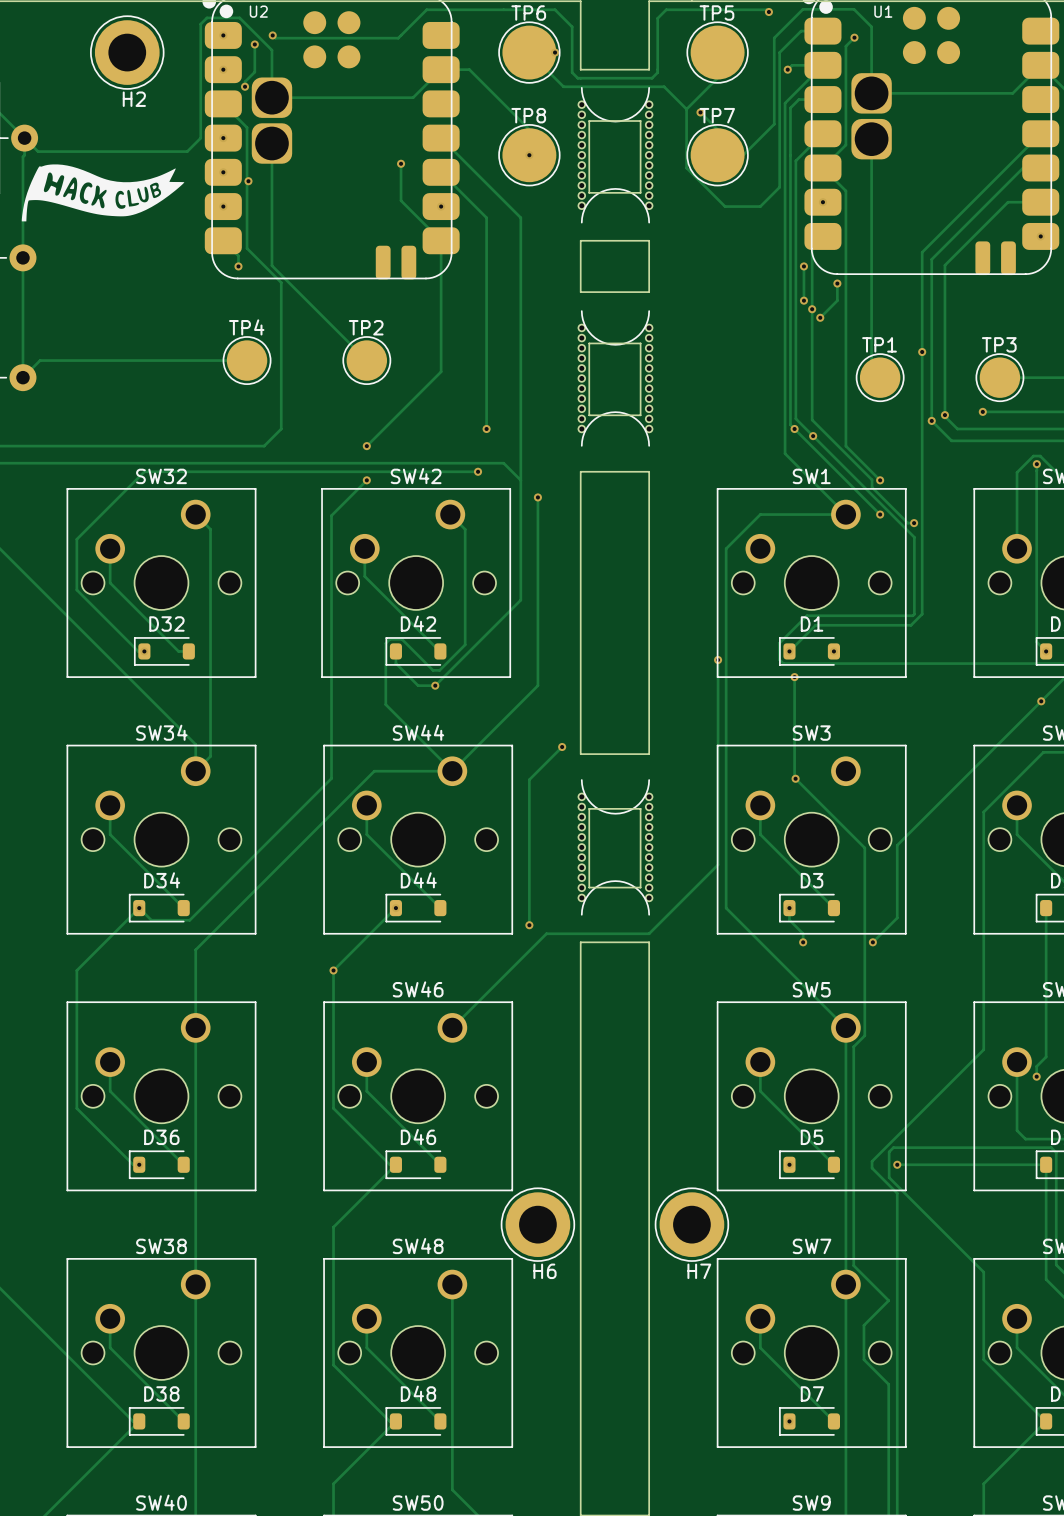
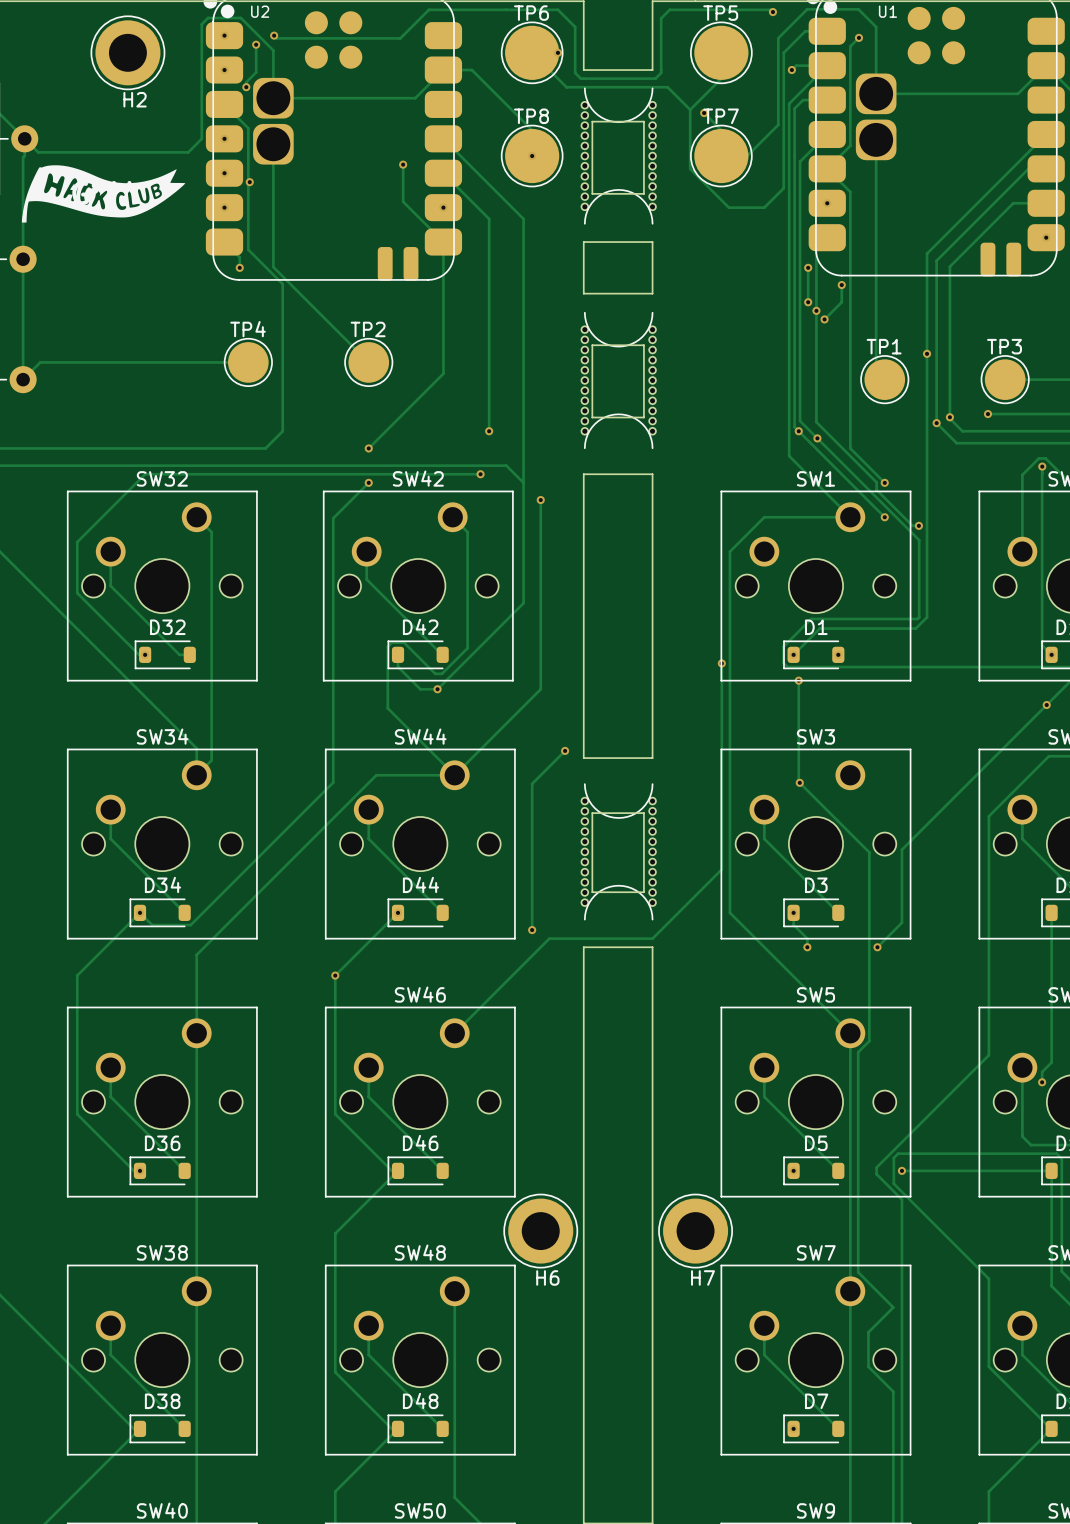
drawing: [21, 164, 185, 222] -> none
part: none -> (103, 193)

